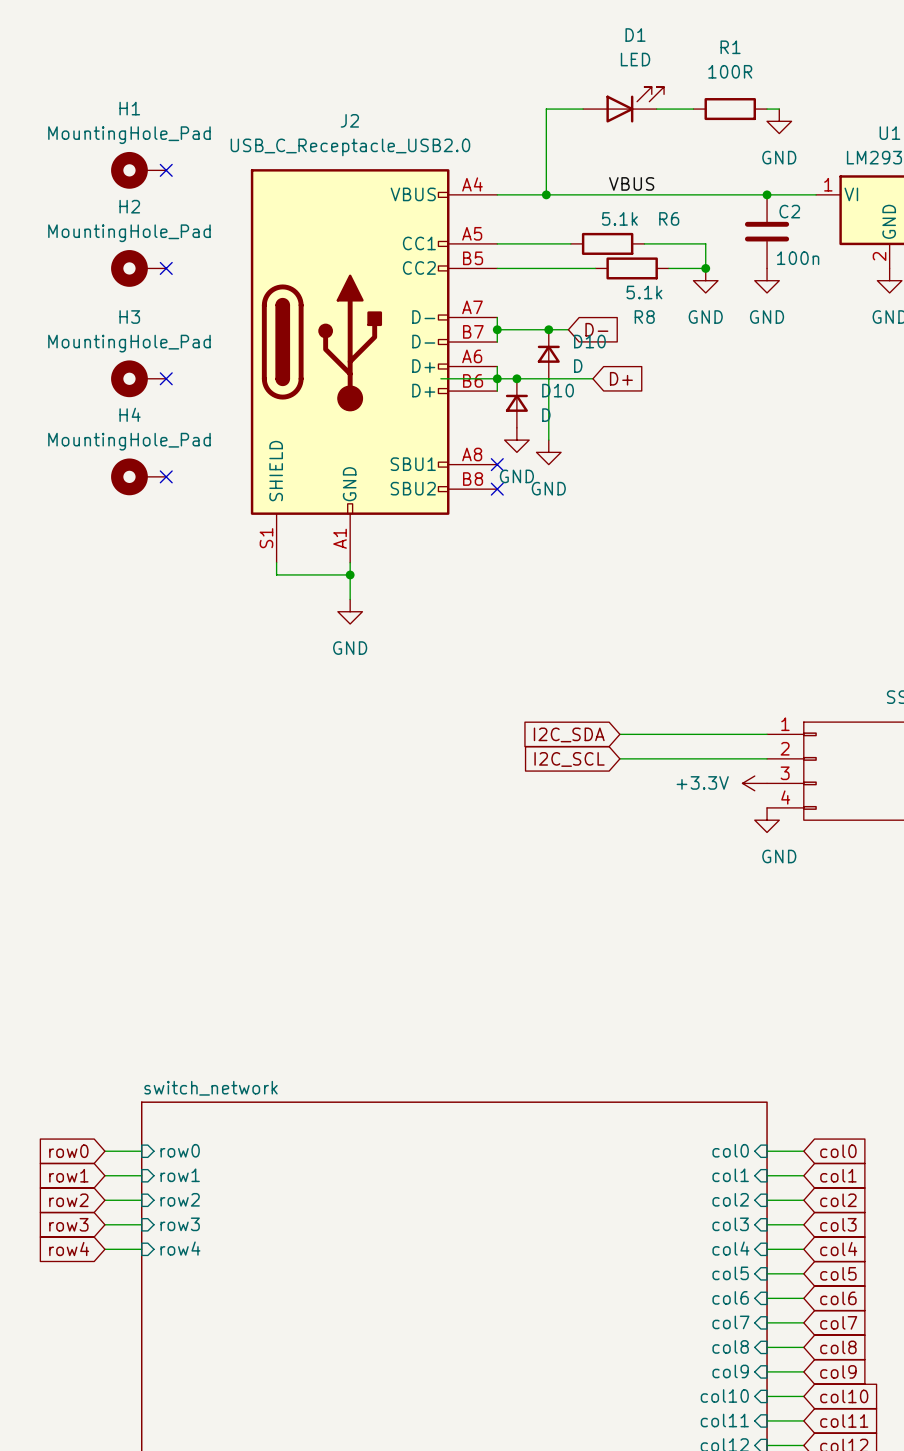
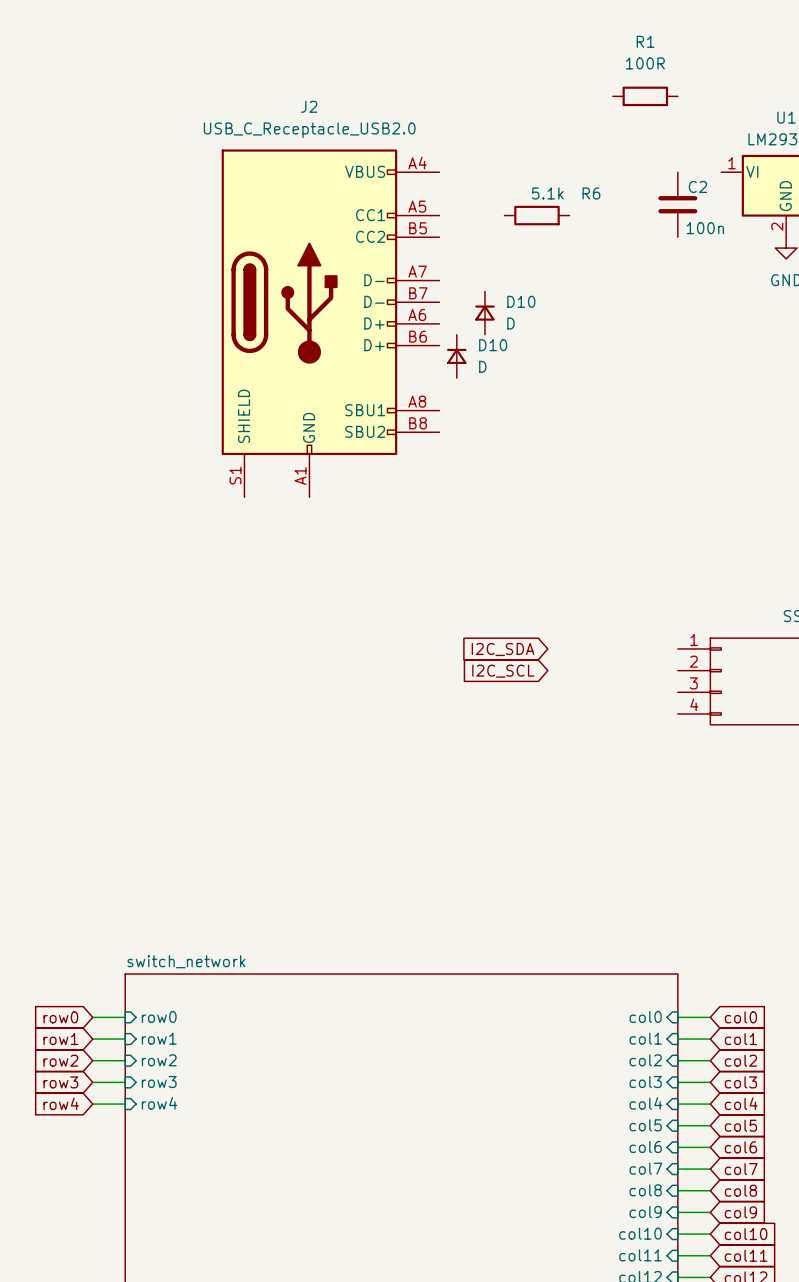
D1: LED (623, 104) -> none
wire: (583, 109) (546, 109) (546, 194) -> none
wire: (656, 109) (693, 109) -> none
wire: (767, 109) (779, 109) -> none
power symbol: GND (779, 121) -> none
H1: MountingHole_Pad (138, 170) -> none
no-connect mark: (166, 170) -> none
label: VBUS (631, 183) -> none
wire: (497, 194) (816, 194) -> none
junction: (546, 194) -> none
junction: (767, 194) -> none
wire: (497, 243) (570, 243) -> none
wire: (644, 243) (705, 243) (705, 268) (668, 268) -> none
H2: MountingHole_Pad (138, 268) -> none
no-connect mark: (166, 268) -> none
wire: (497, 268) (595, 268) -> none
R8: 5.1k (632, 268) -> none
junction: (705, 268) -> none
power symbol: GND (705, 280) -> none
power symbol: GND (767, 280) -> none
wire: (497, 317) (497, 342) -> none
wire: (497, 329) (568, 329) -> none
junction: (497, 329) -> none
junction: (548, 329) -> none
global label: D- (596, 329) -> none
wire: (497, 366) (497, 391) -> none
H3: MountingHole_Pad (138, 378) -> none
no-connect mark: (166, 378) -> none
wire: (440, 378) (592, 378) -> none
junction: (497, 378) -> none
junction: (516, 378) -> none
wire: (548, 378) (548, 440) -> none
global label: D+ (621, 378) -> none
power symbol: GND (516, 440) -> none
power symbol: GND (548, 452) -> none
no-connect mark: (497, 464) -> none
H4: MountingHole_Pad (138, 476) -> none
no-connect mark: (166, 476) -> none
no-connect mark: (497, 489) -> none
wire: (276, 562) (276, 574) (350, 574) -> none
wire: (350, 562) (350, 599) -> none
junction: (350, 574) -> none
power symbol: GND (350, 611) -> none
wire: (619, 734) (767, 734) -> none
wire: (619, 758) (767, 758) -> none
power symbol: +3.3V (754, 783) -> none
power symbol: GND (767, 820) -> none

